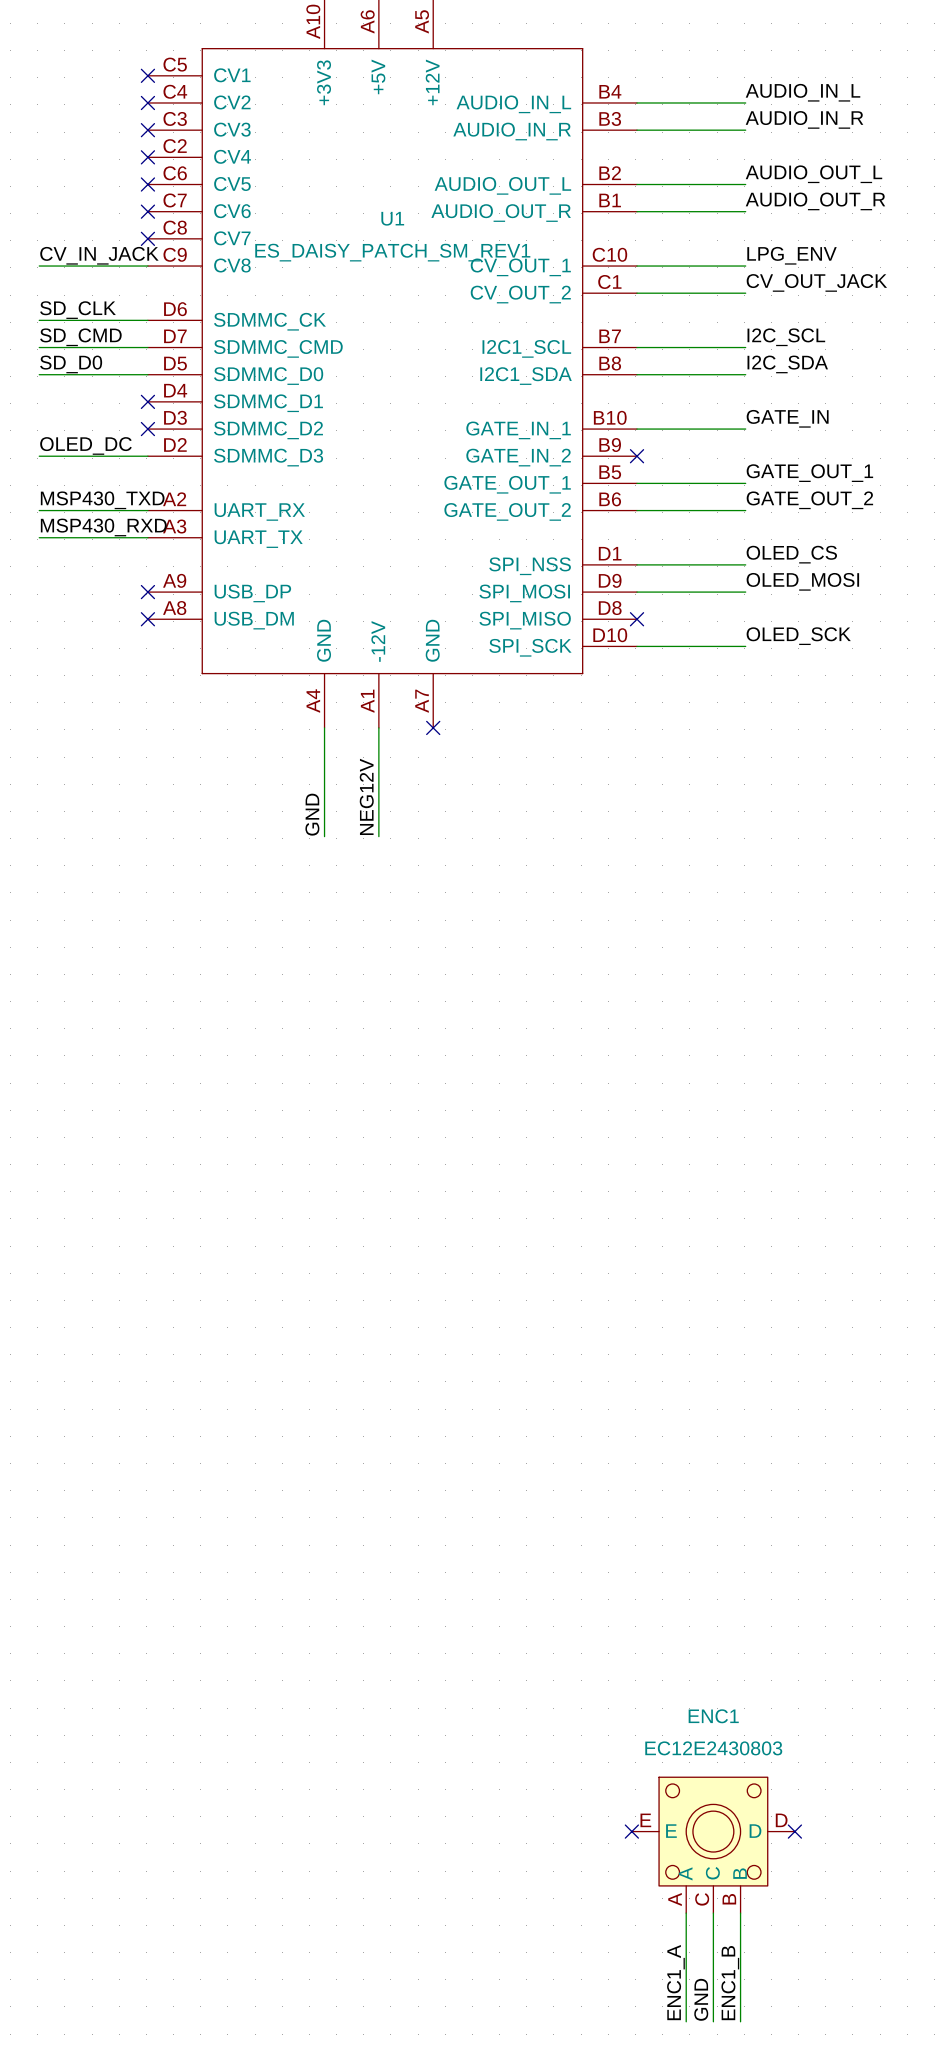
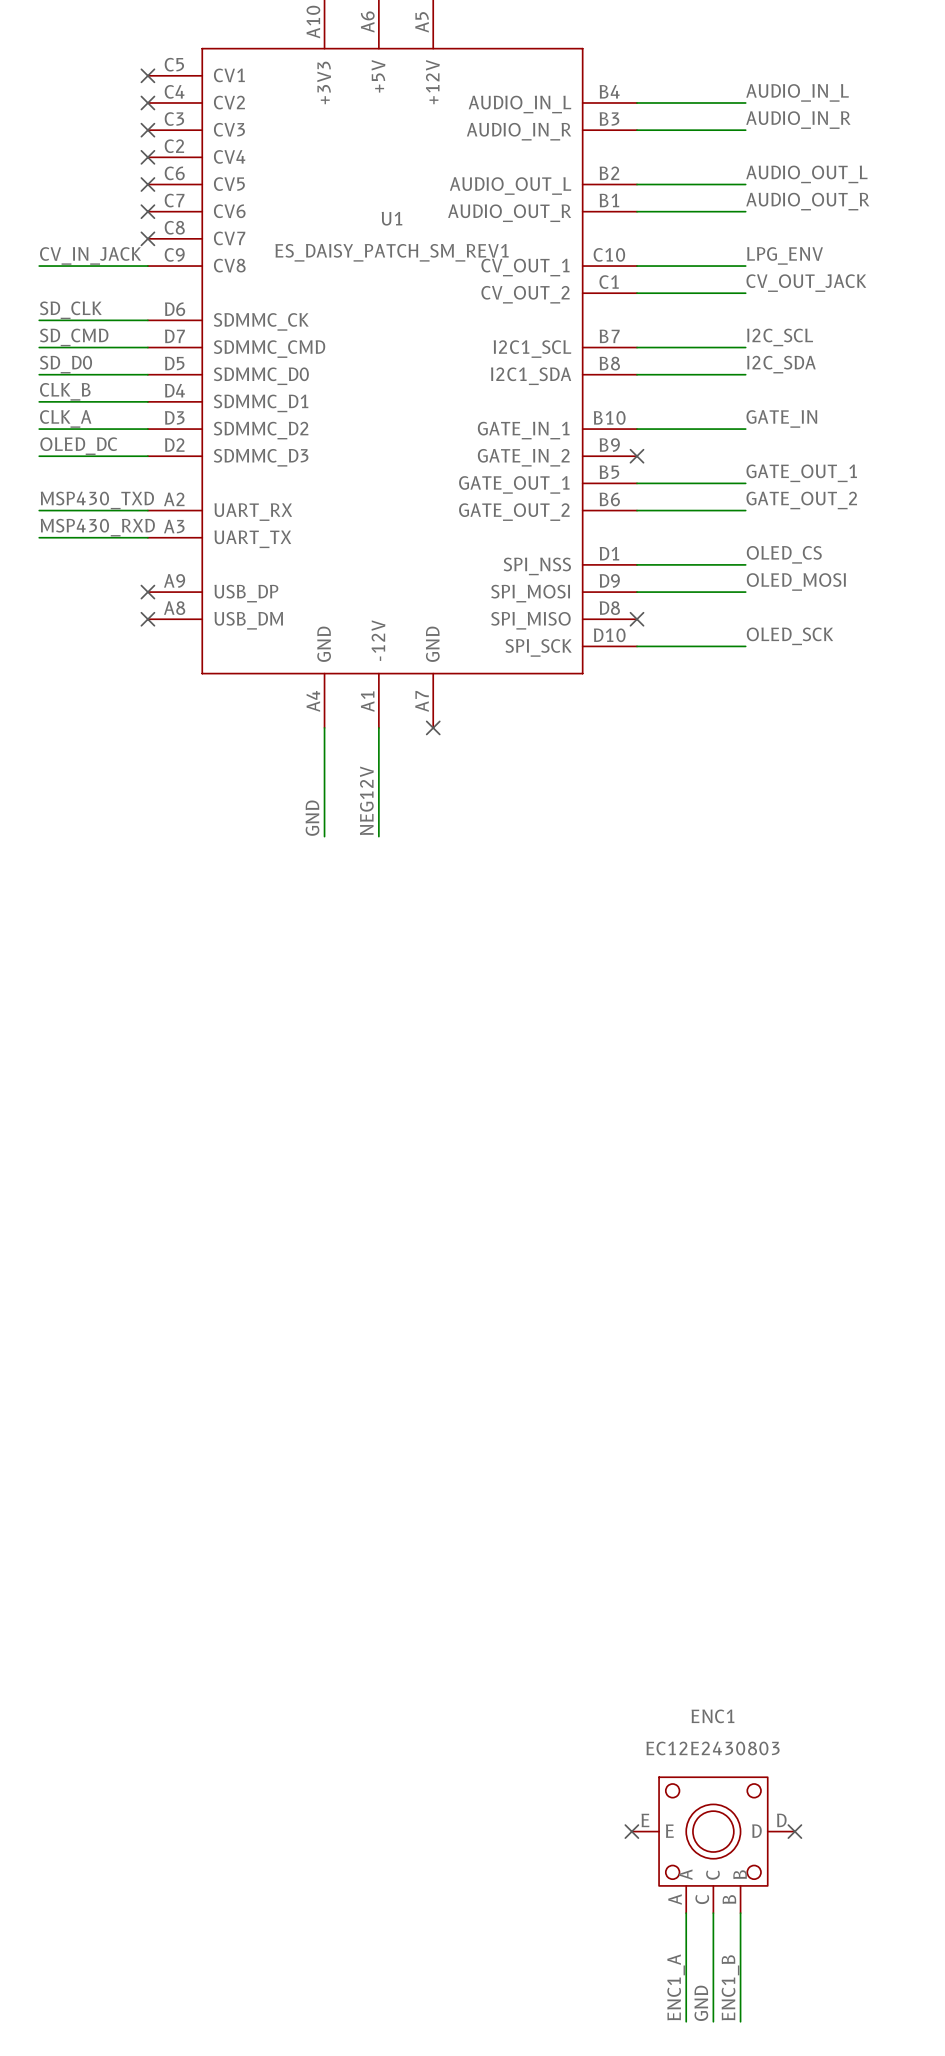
label: none -> CLK_B (65, 391)
wire: none -> (39, 401) (147, 401)
no-connect mark: (147, 401) -> none
label: none -> CLK_A (65, 418)
wire: none -> (39, 429) (147, 429)
no-connect mark: (147, 429) -> none

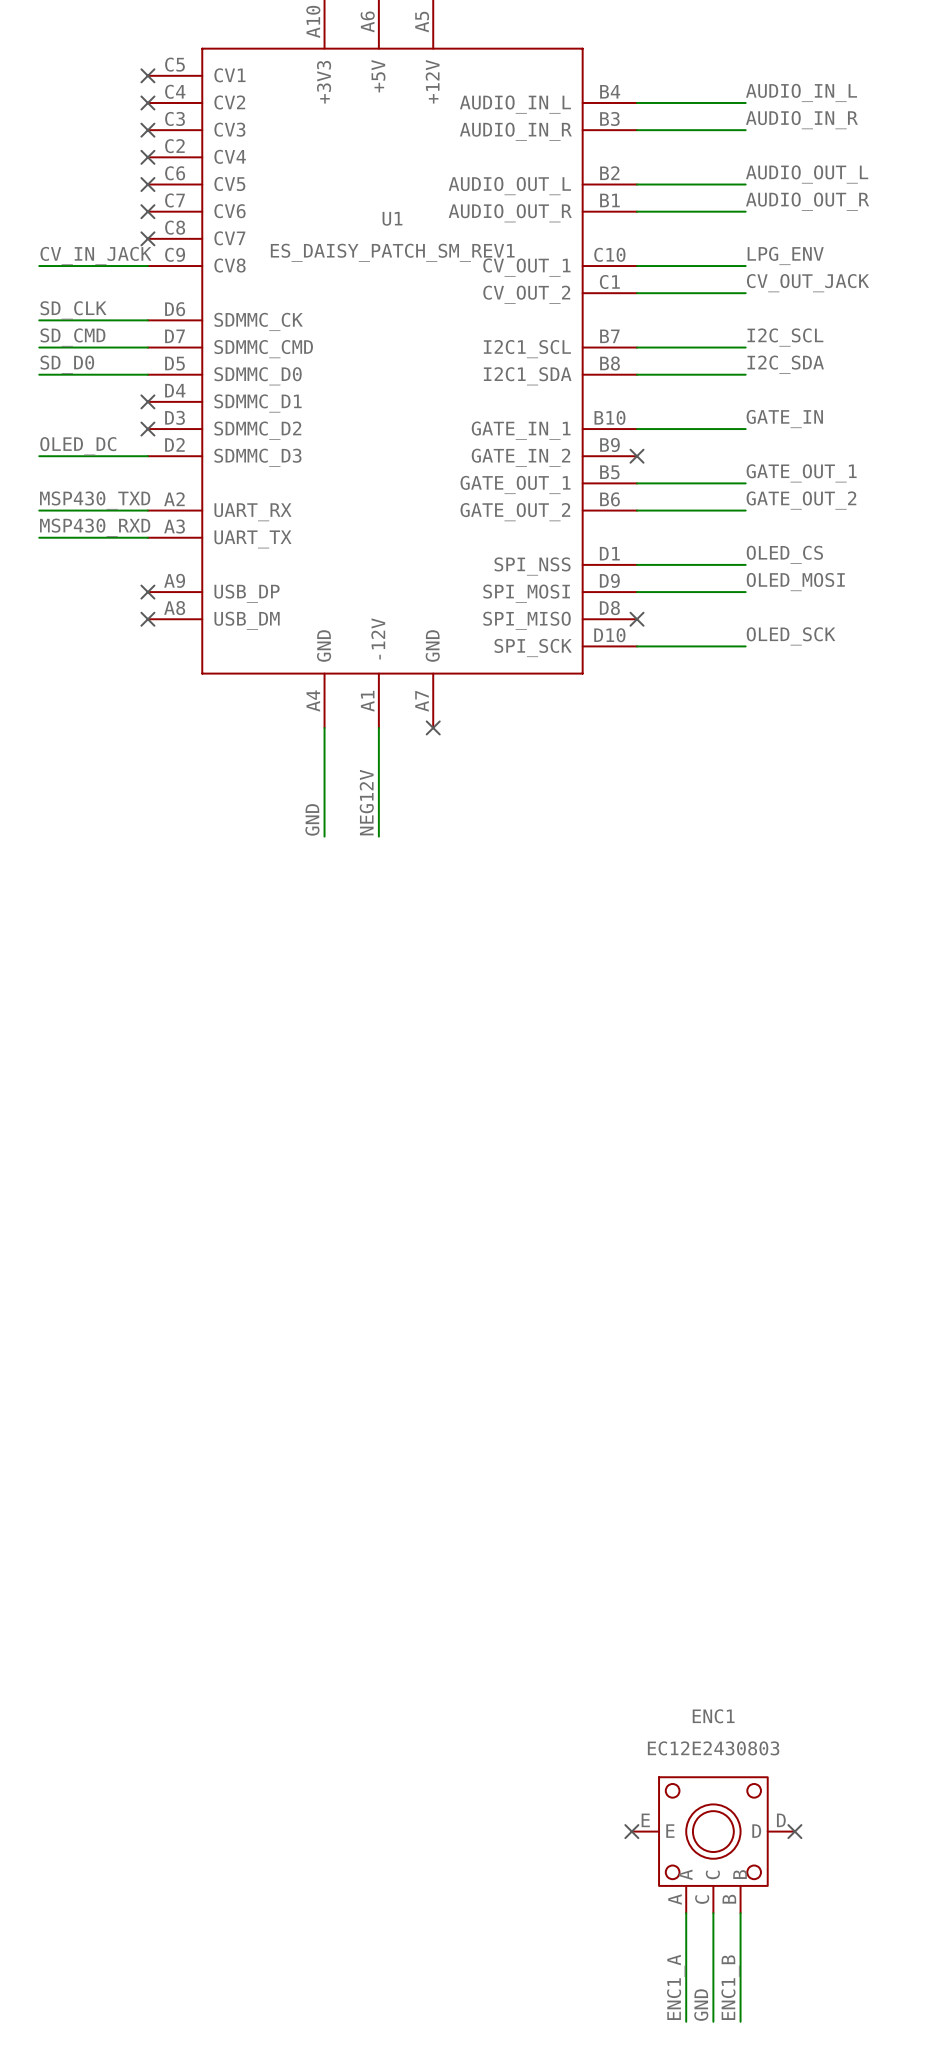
label: CLK_B (65, 391) -> none
wire: (39, 401) (147, 401) -> none
no-connect mark: none -> (147, 401)
label: CLK_A (65, 418) -> none
wire: (39, 429) (147, 429) -> none
no-connect mark: none -> (147, 429)

